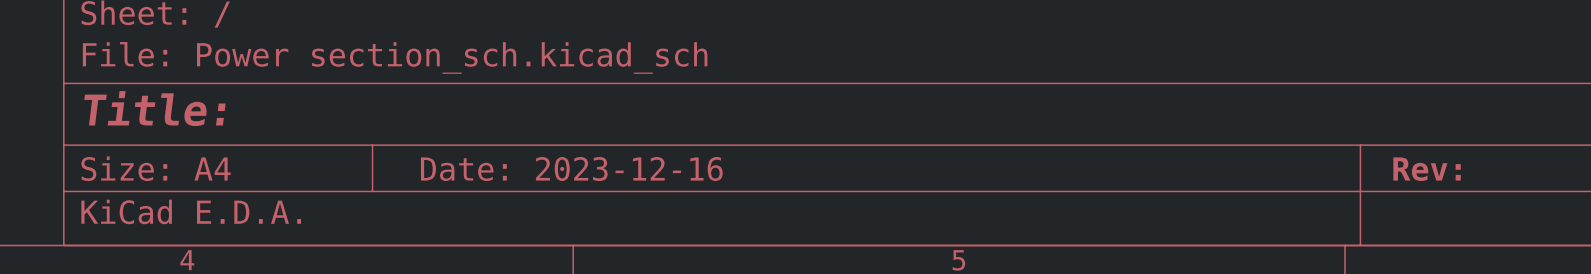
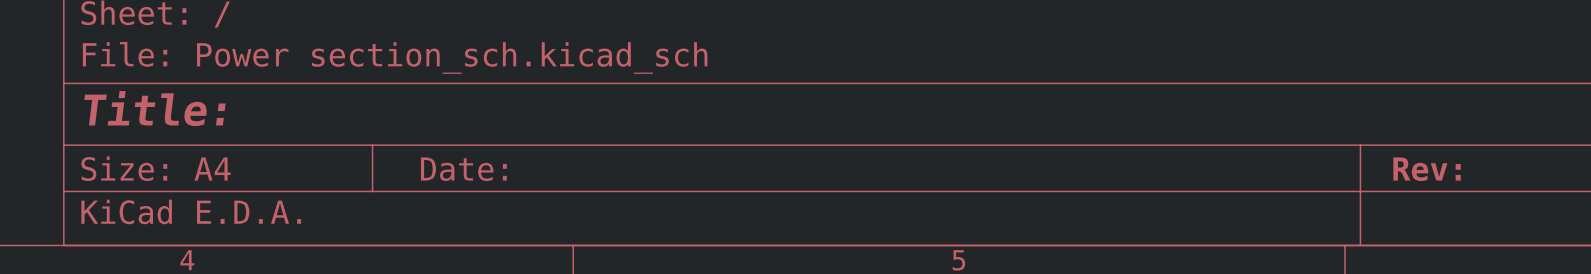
title block: Date: 2023-12-16 (571, 169) -> Date: (463, 169)

